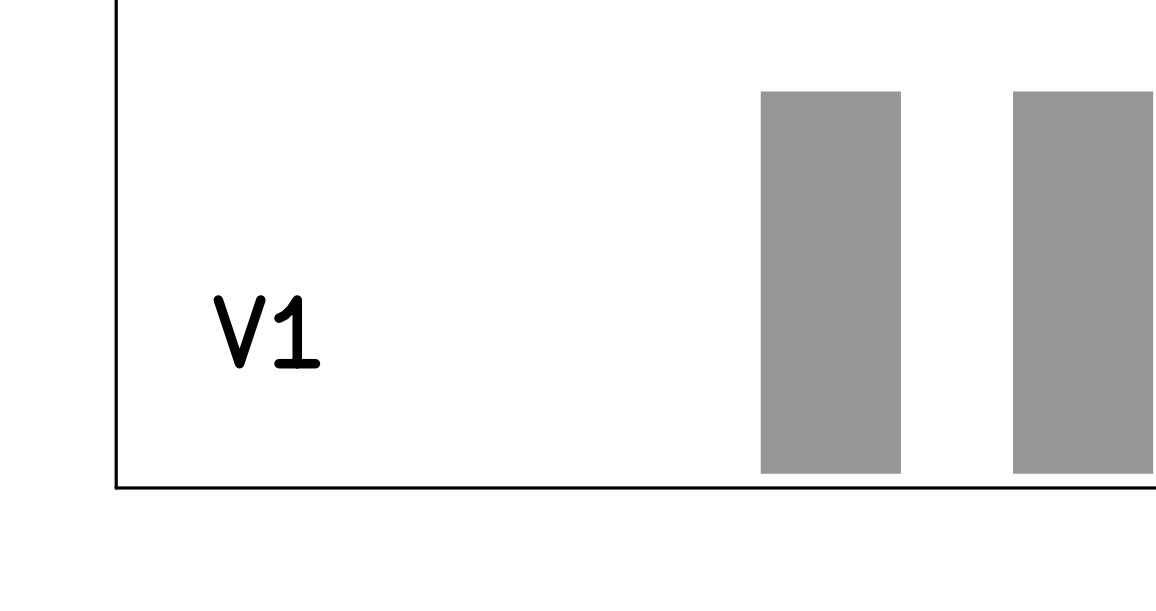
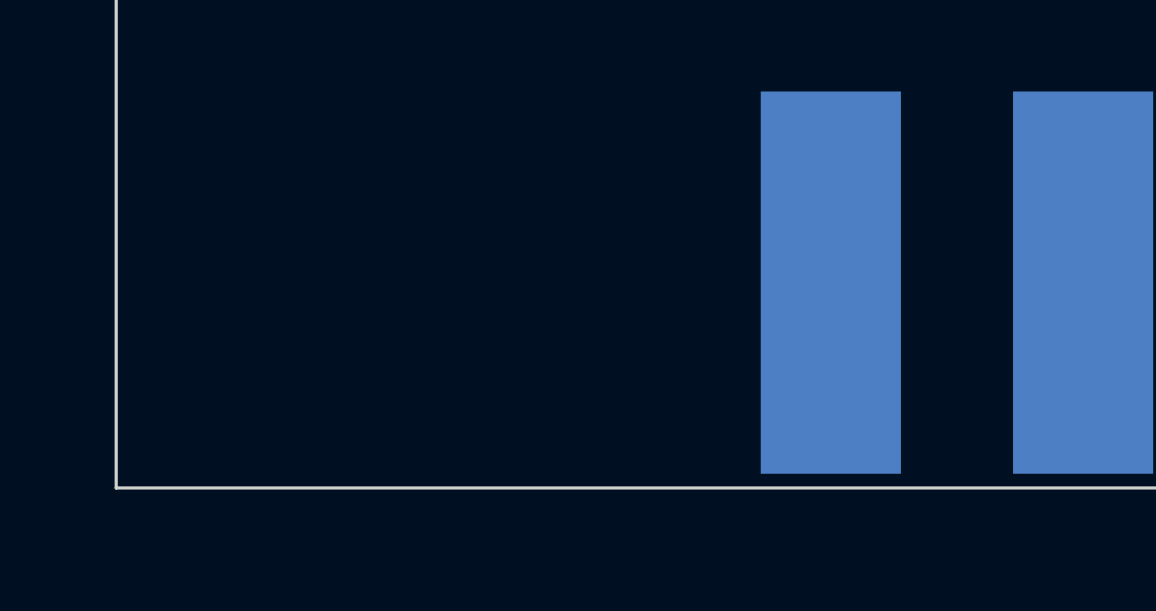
text: V1 (266, 331) -> none

